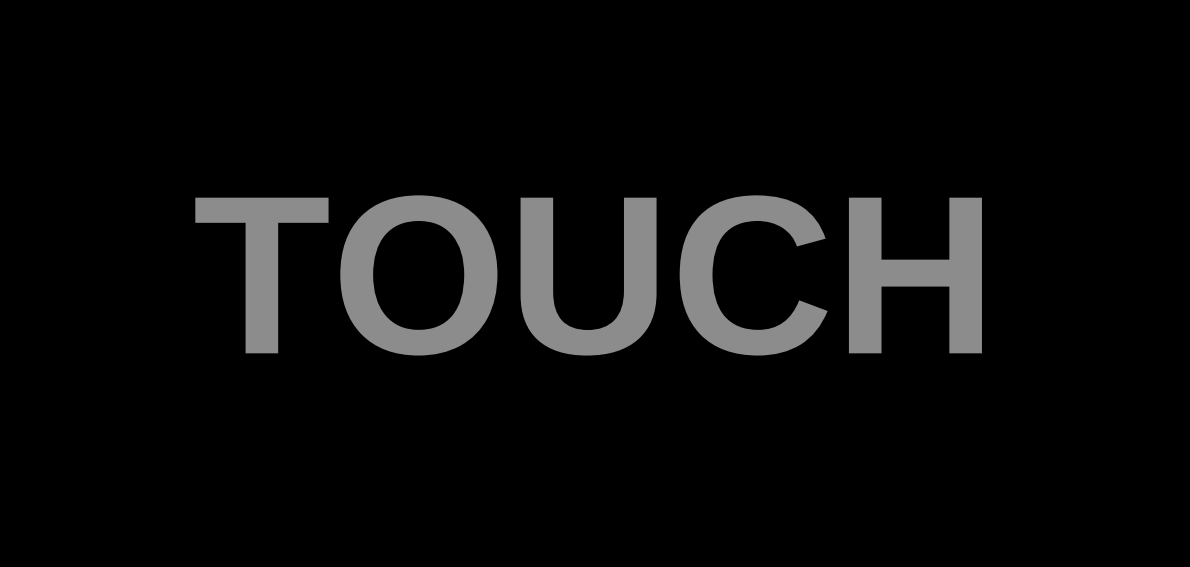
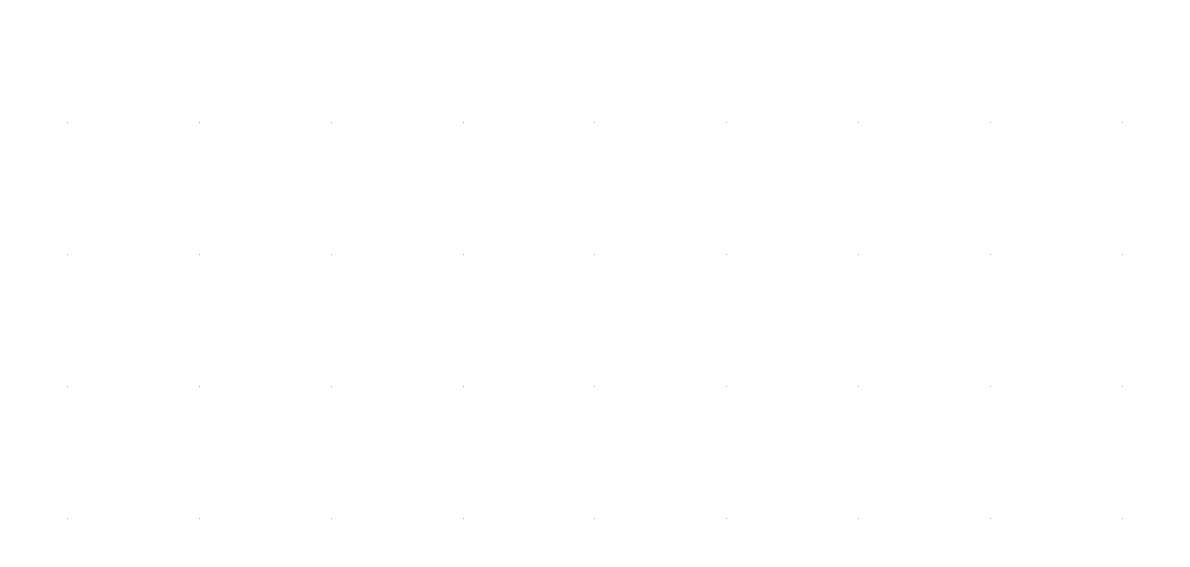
text: TOUCH (588, 275) -> none

